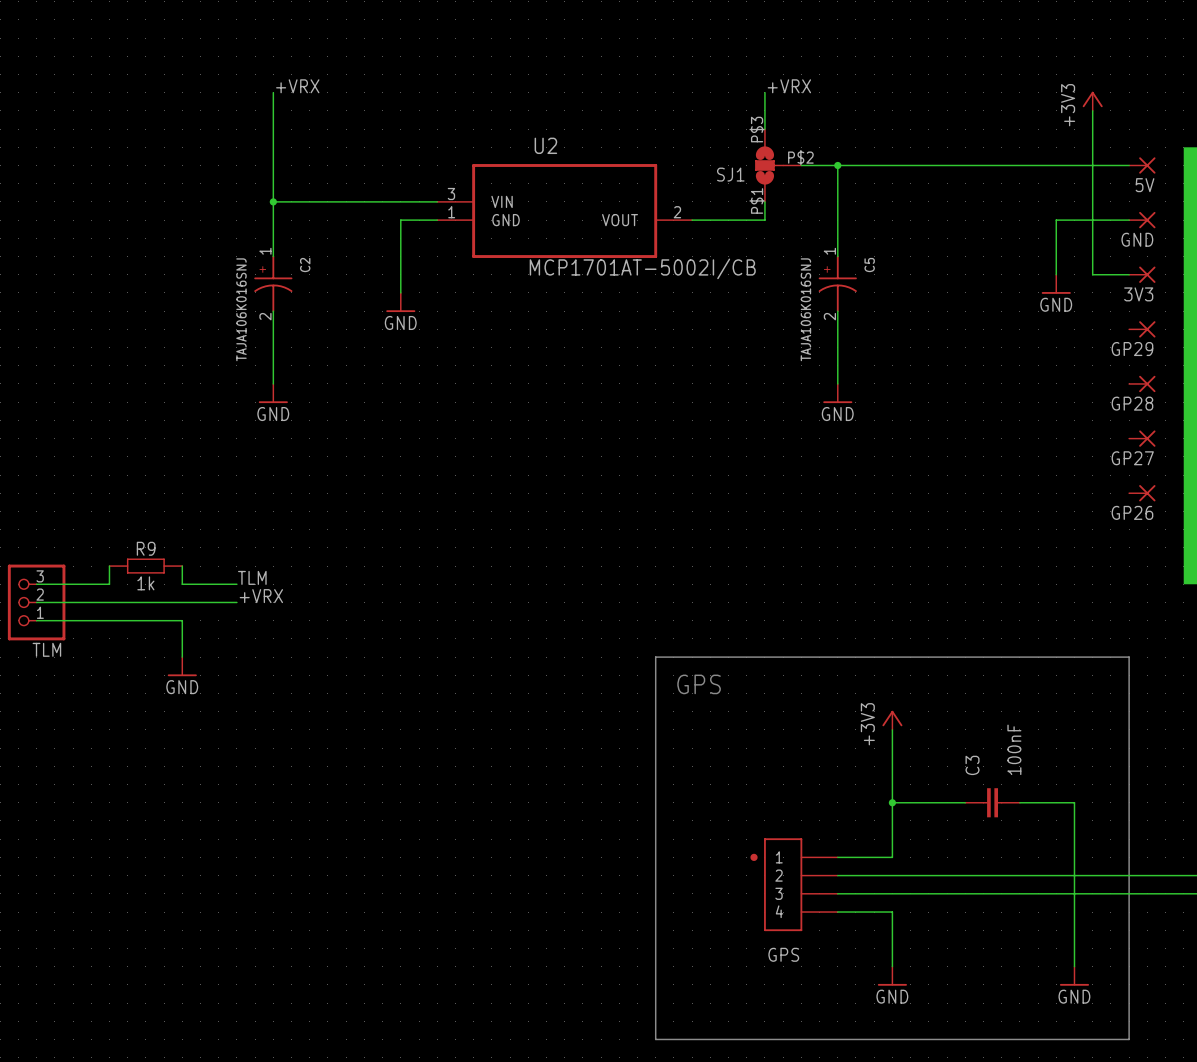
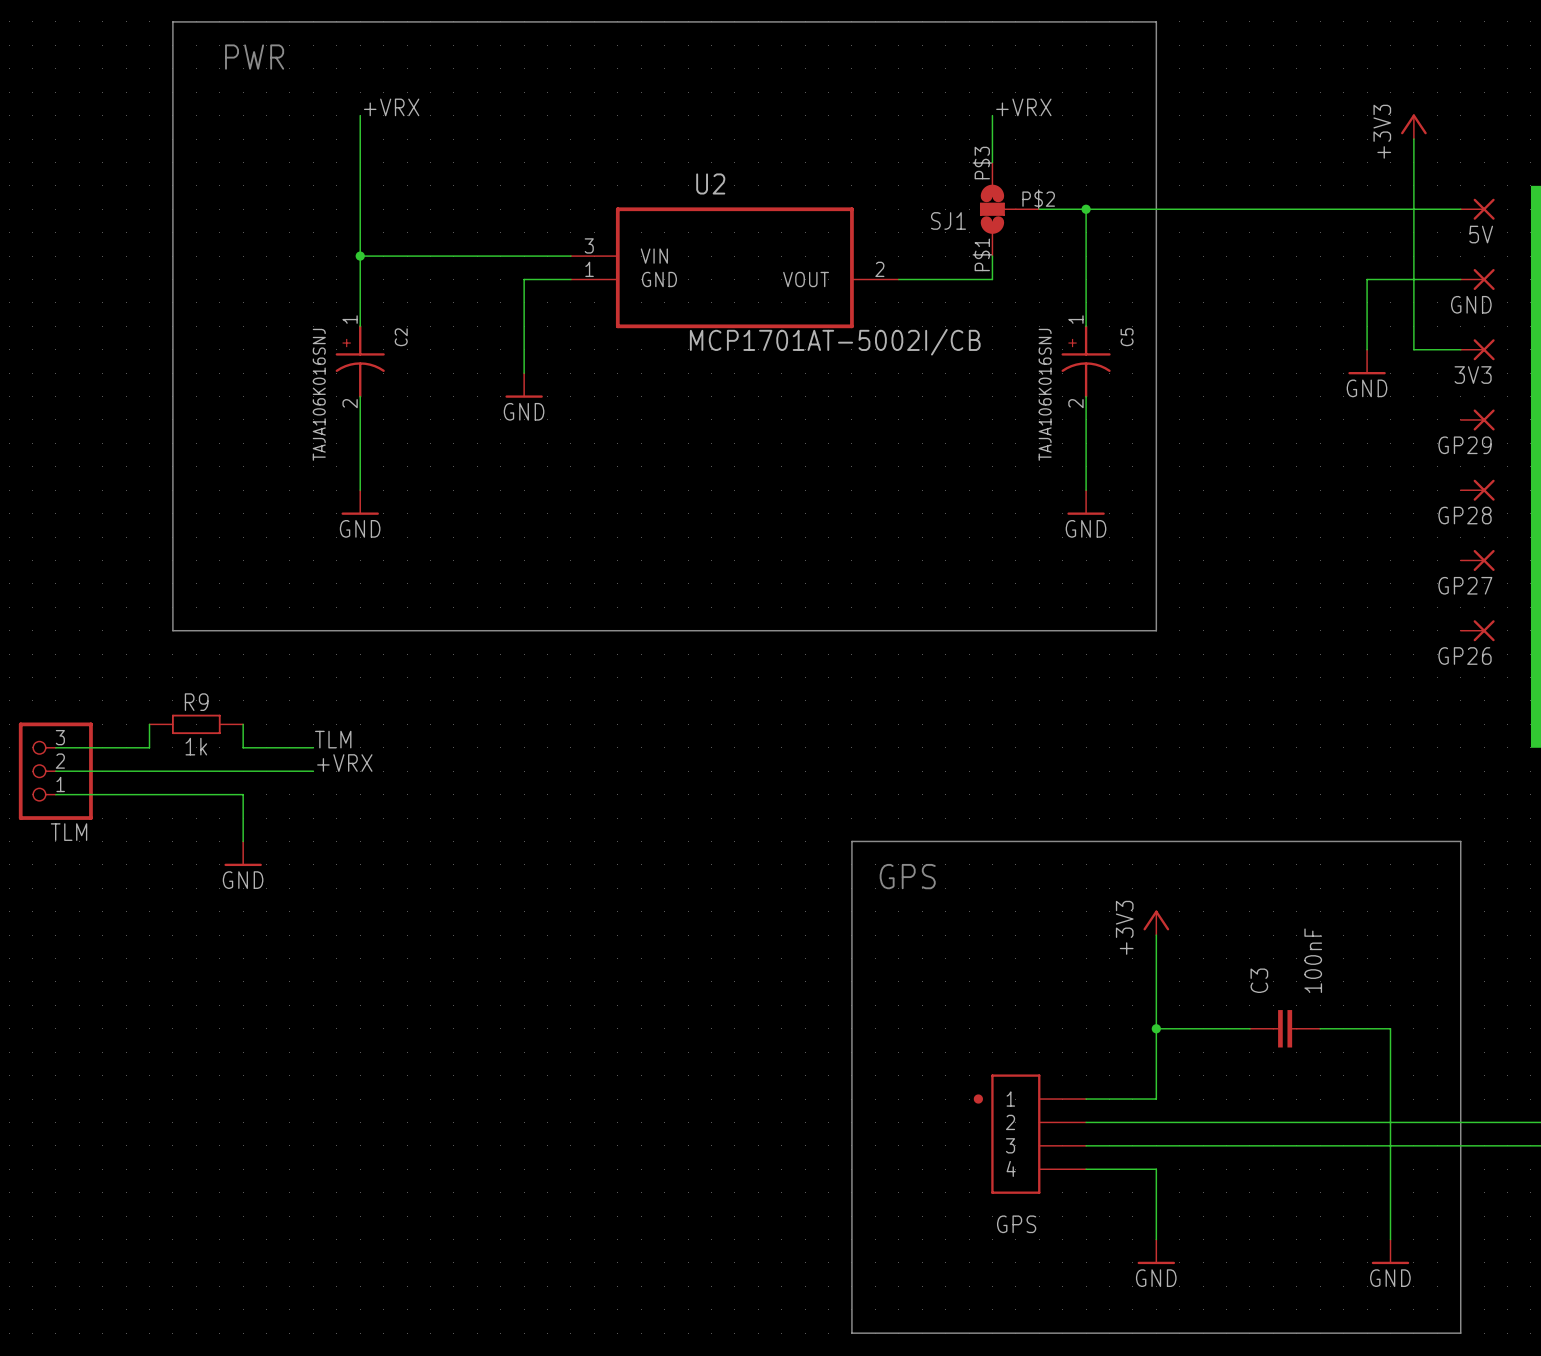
line: none -> (172, 21) (172, 630) (1156, 630) (1156, 21) (172, 21)
text: none -> PWR (254, 57)

